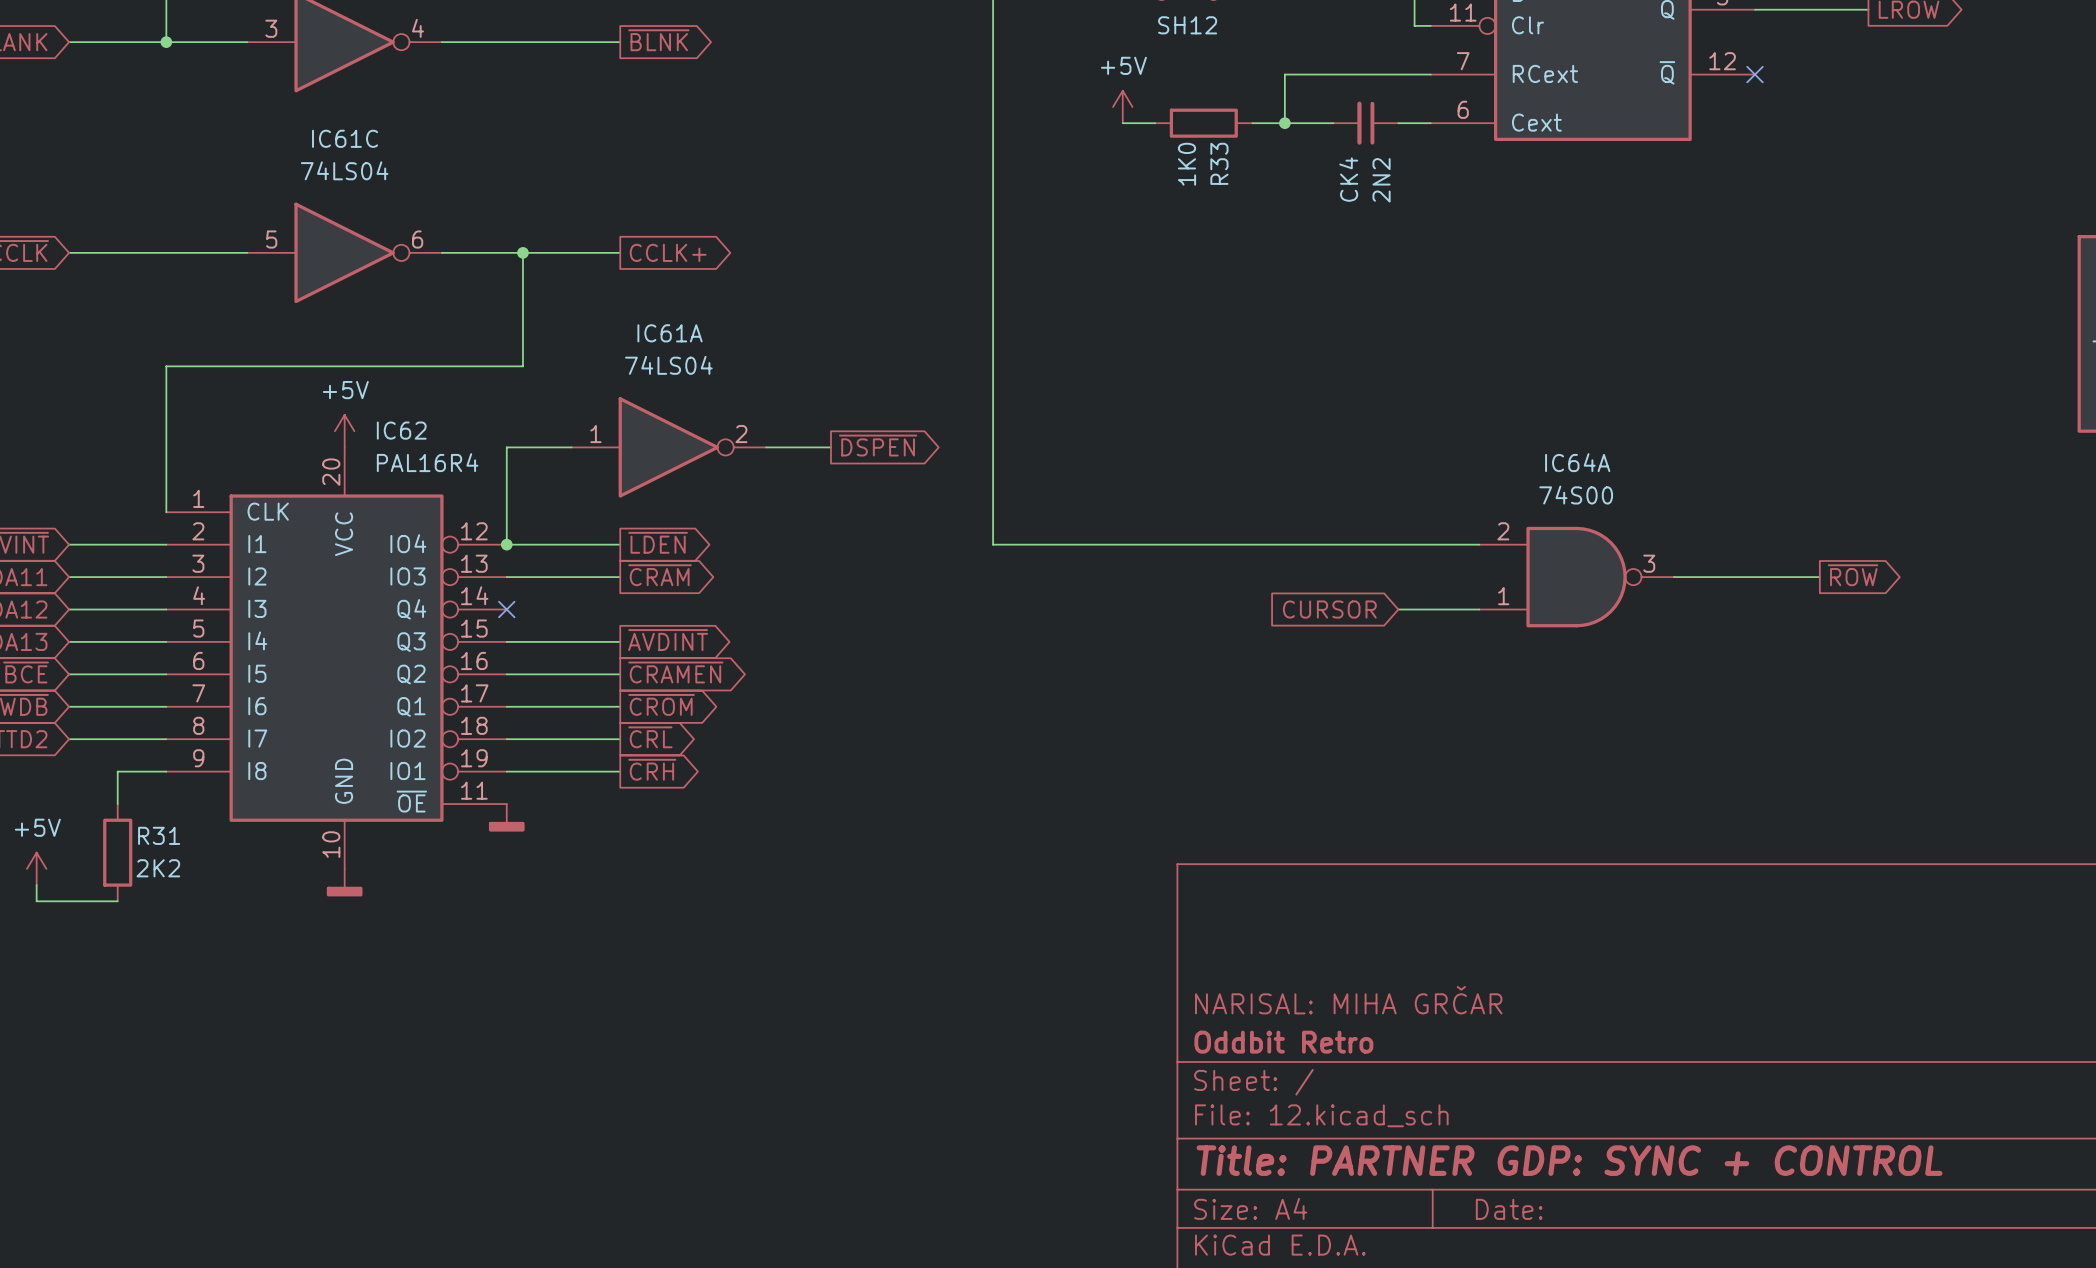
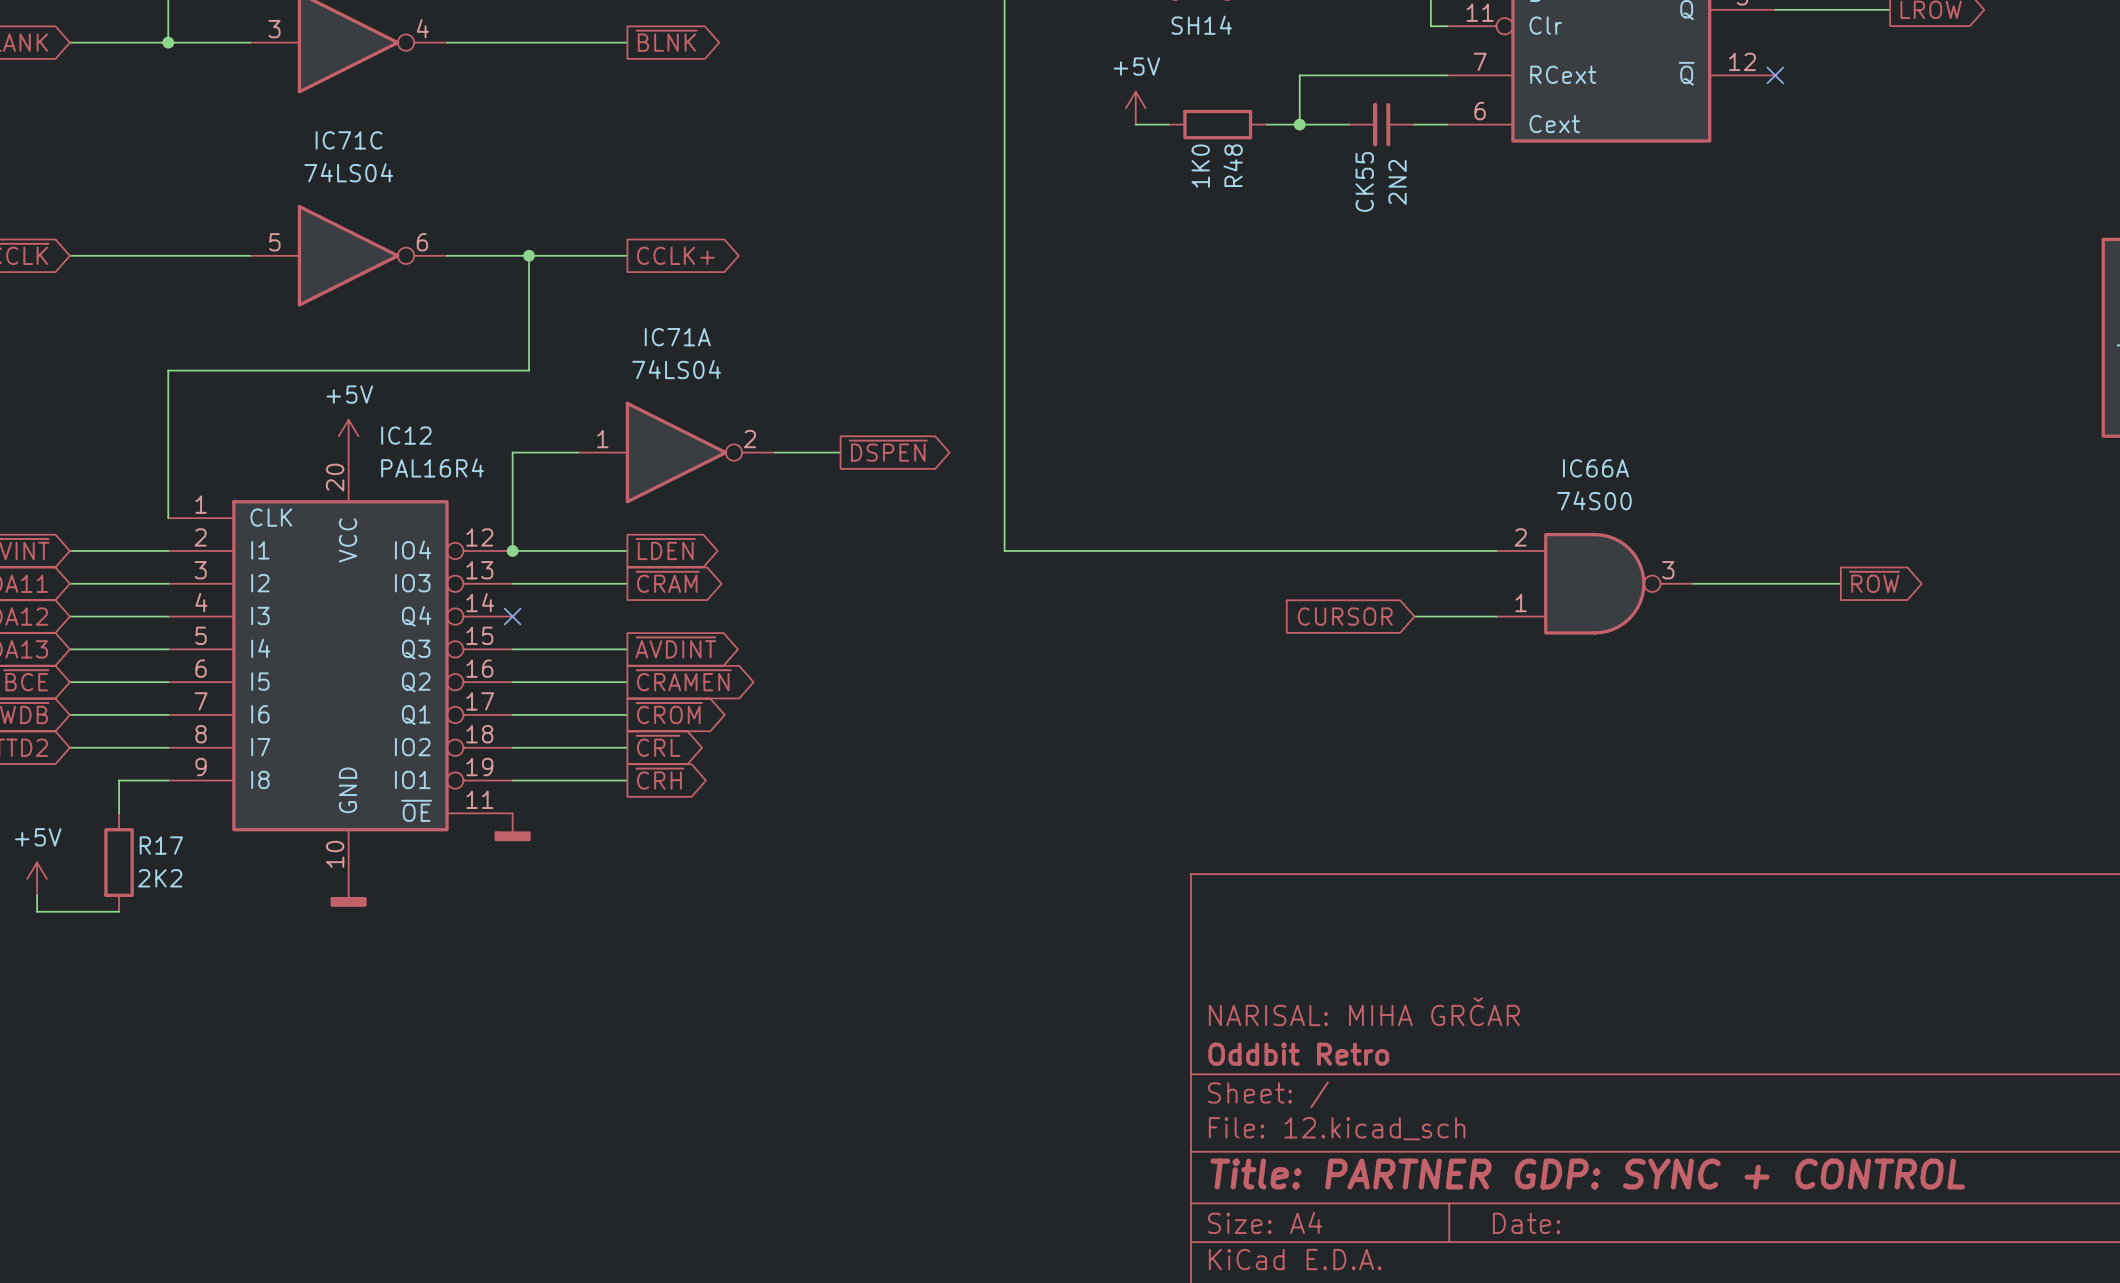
SH12 name: SH12 (1187, 25) -> SH14 (1201, 25)
IC61C name: IC61C (345, 138) -> IC71C (349, 140)
R33 name: R33 (1219, 163) -> R48 (1233, 165)
CK4 name: CK4 (1348, 179) -> CK55 (1364, 182)
IC61A name: IC61A (670, 333) -> IC71A (677, 337)
IC62 name: IC62 (401, 430) -> IC12 (406, 435)
IC64A name: IC64A (1577, 462) -> IC66A (1595, 468)
R31 name: R31 (159, 835) -> R17 (161, 845)

